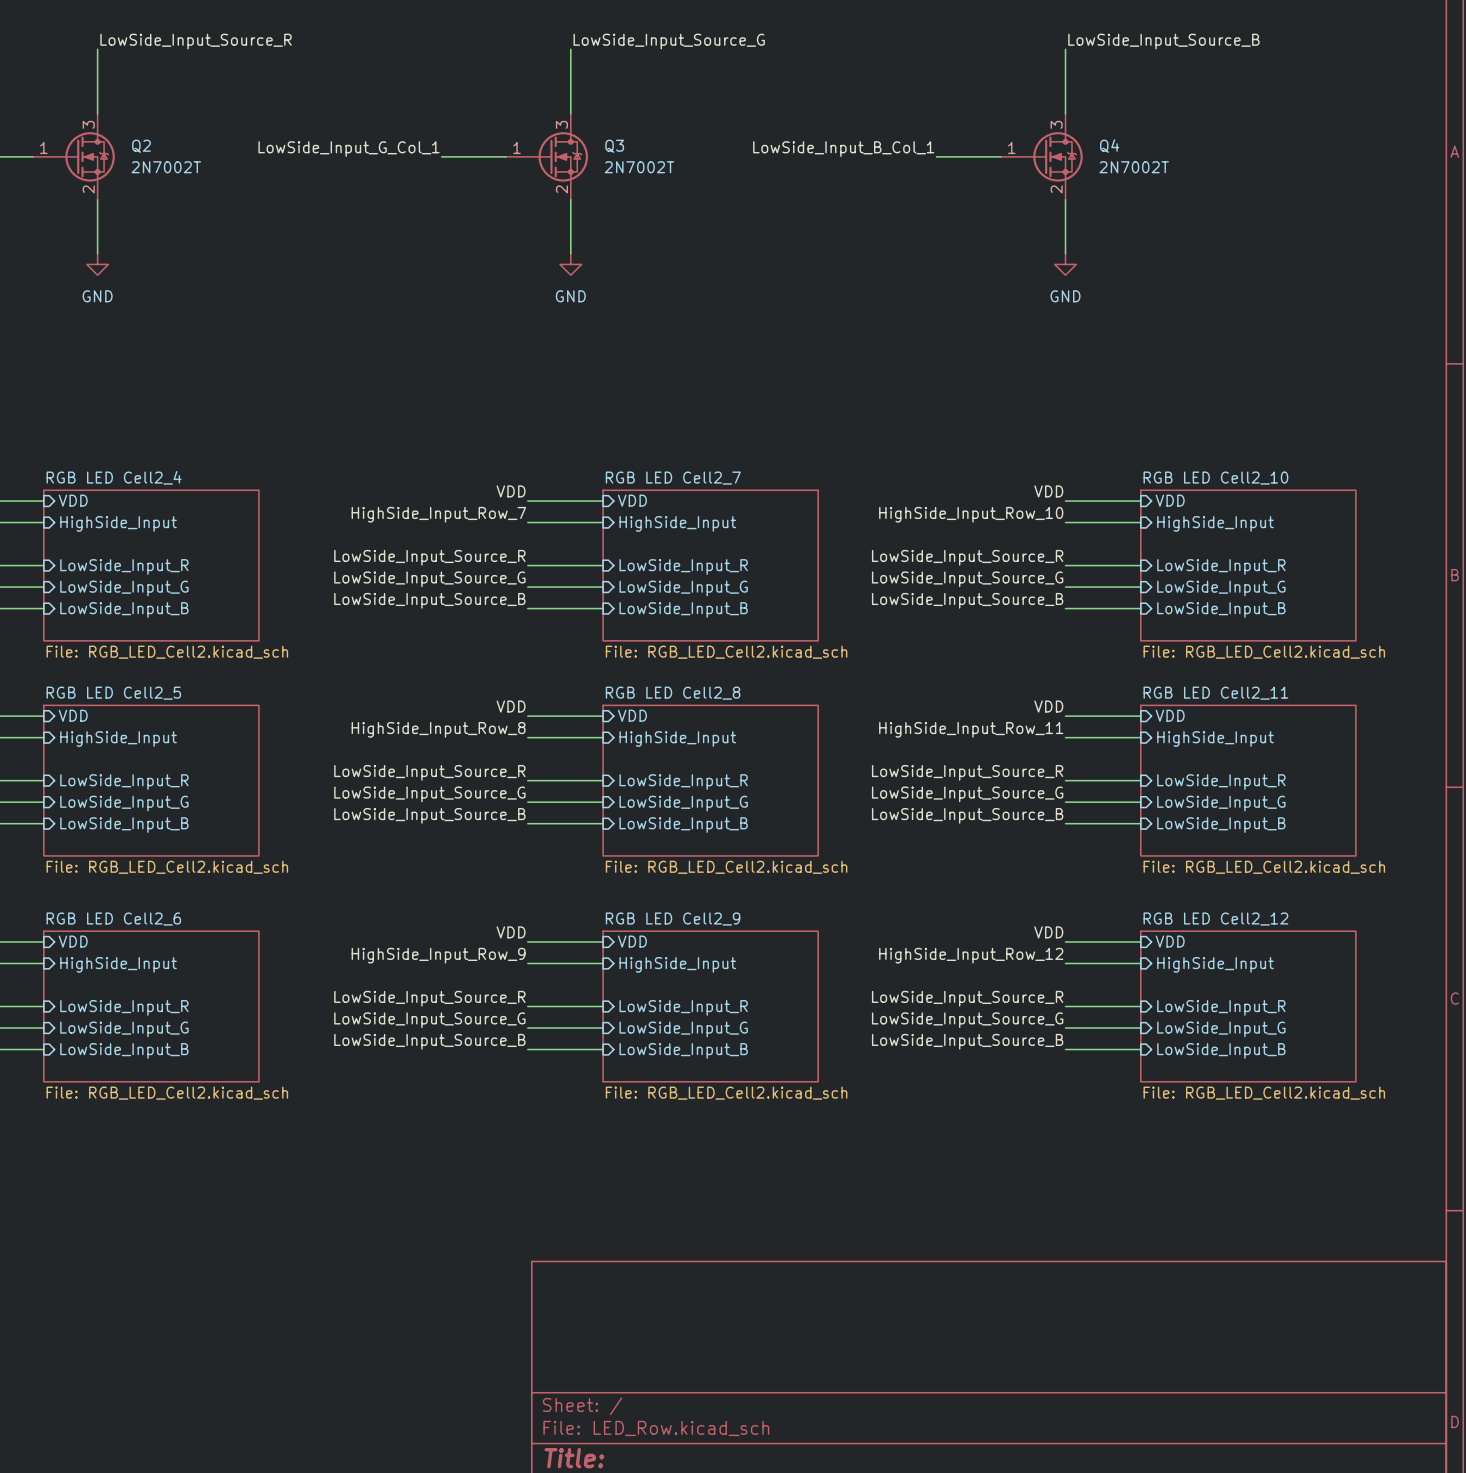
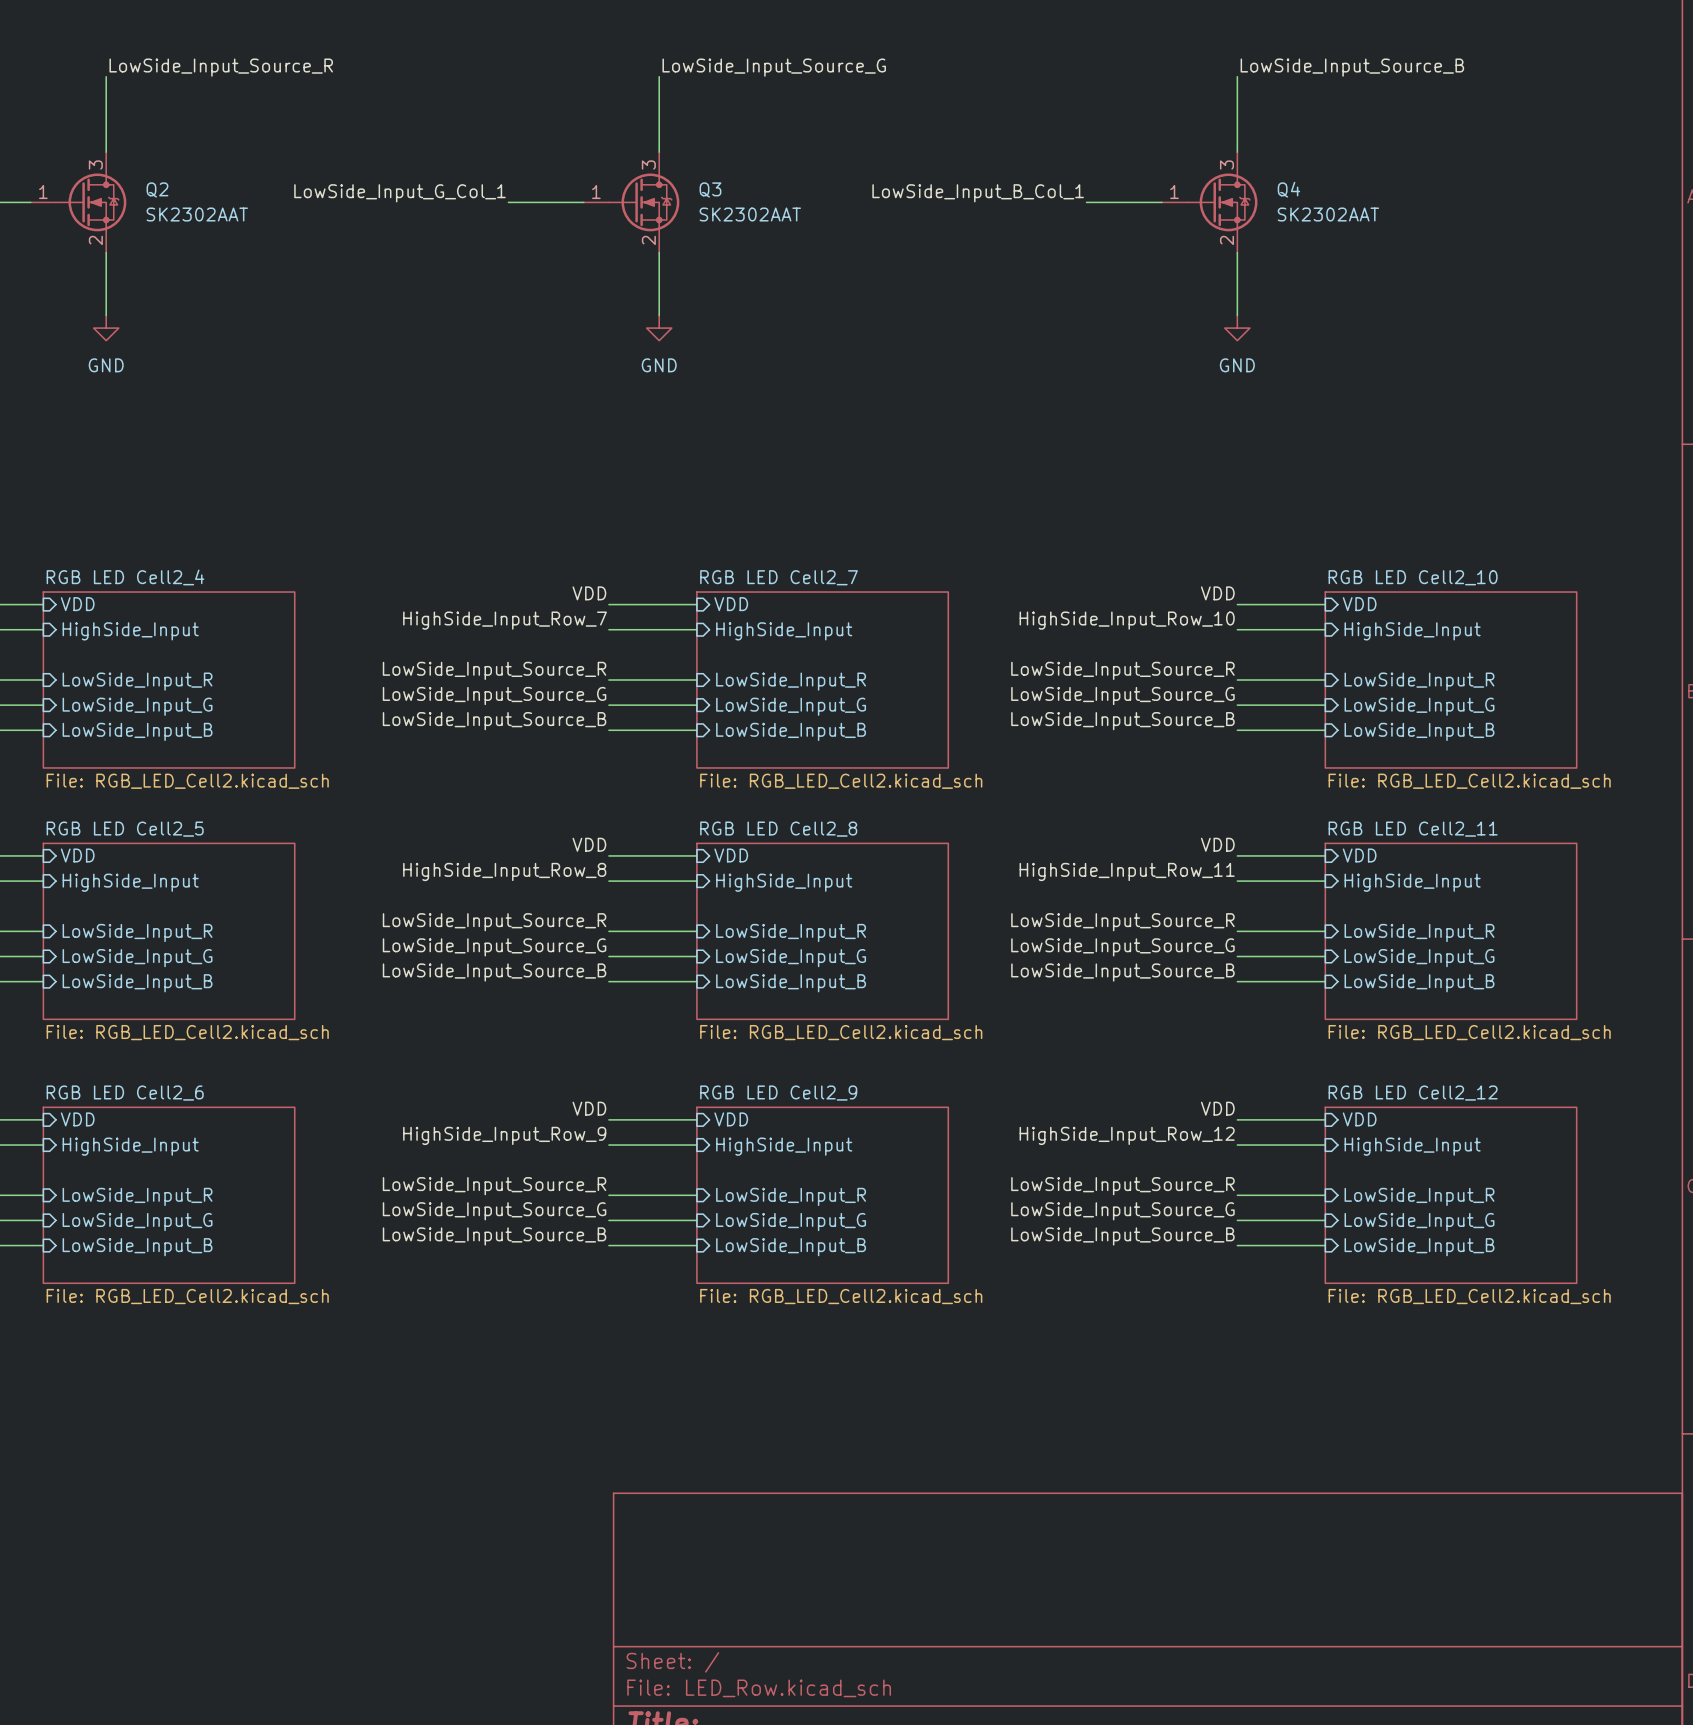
Q2 value: 2N7002T (166, 167) -> SK2302AAT (197, 214)
Q3 value: 2N7002T (639, 167) -> SK2302AAT (750, 214)
Q4 value: 2N7002T (1134, 167) -> SK2302AAT (1328, 214)

